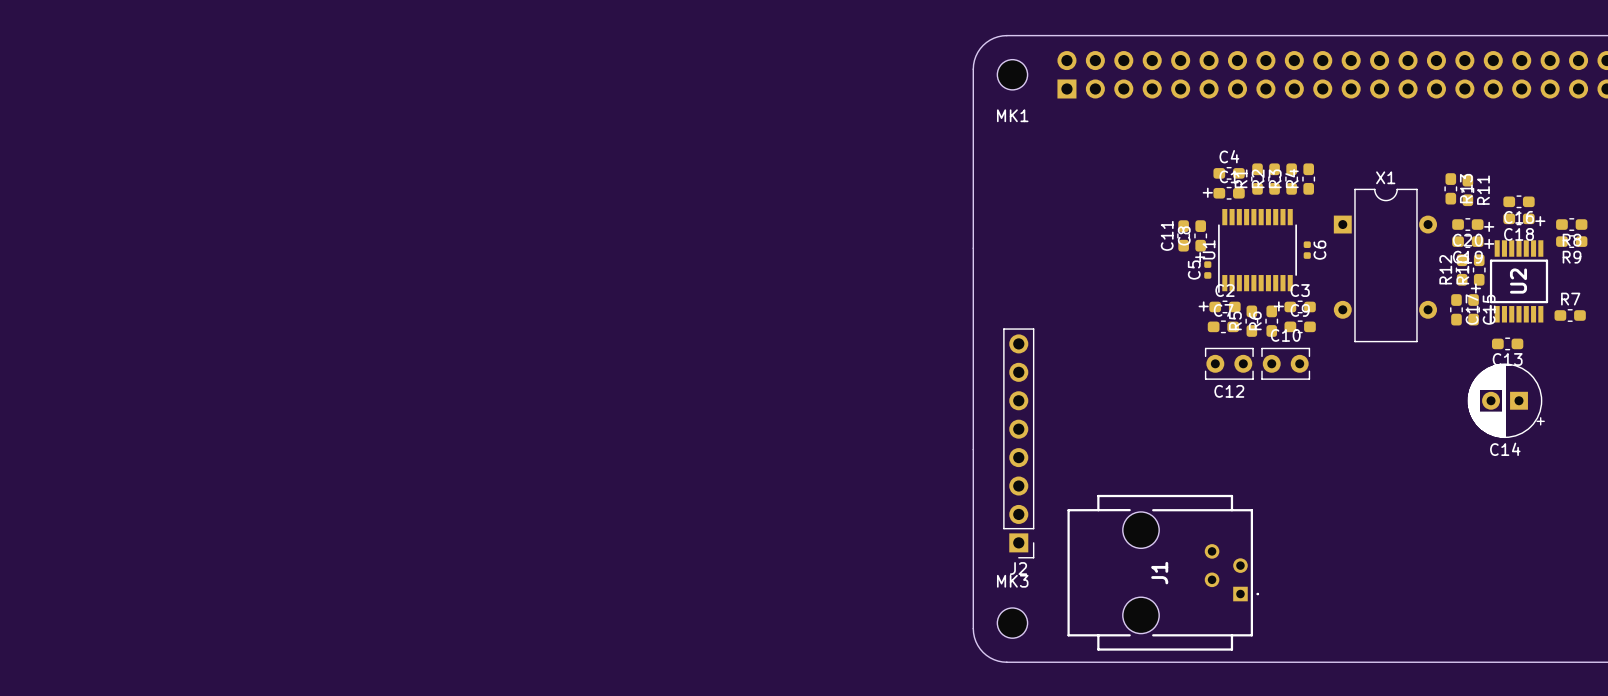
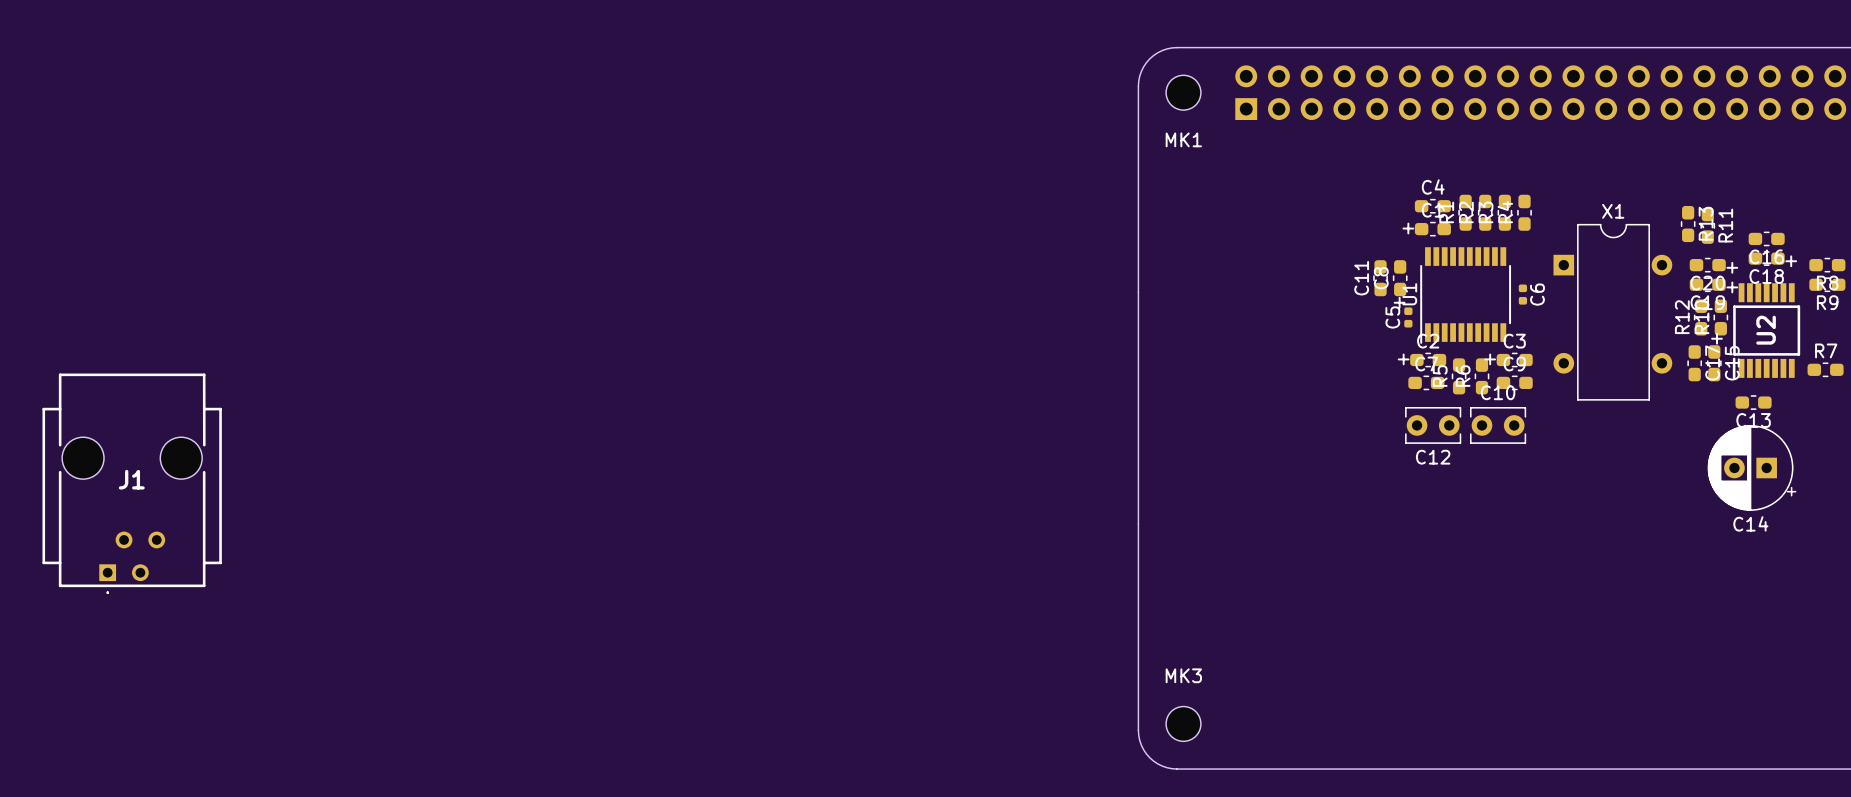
J2: (1018, 443) -> none
J1 rotation: 0° (1163, 572) -> 90° clockwise (132, 483)
J1 position: (1163, 572) -> (132, 483)

